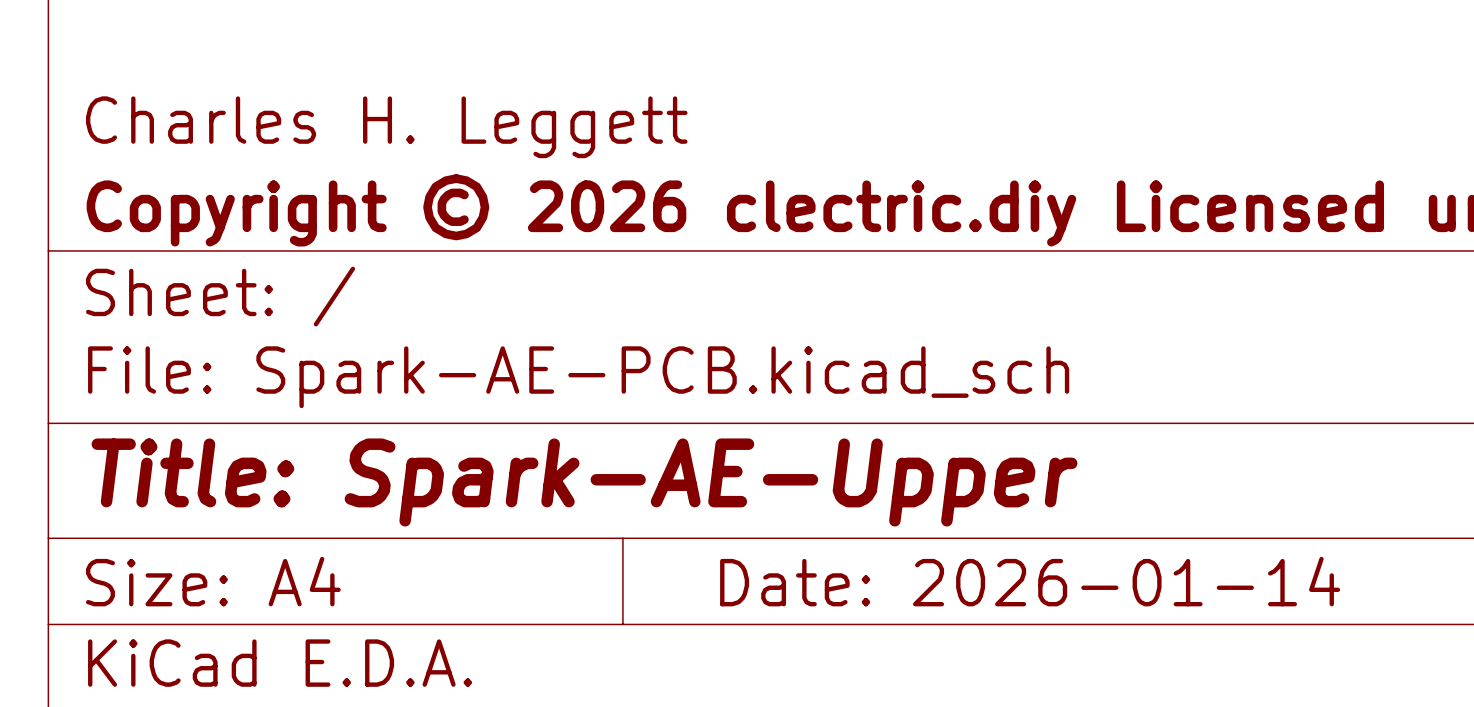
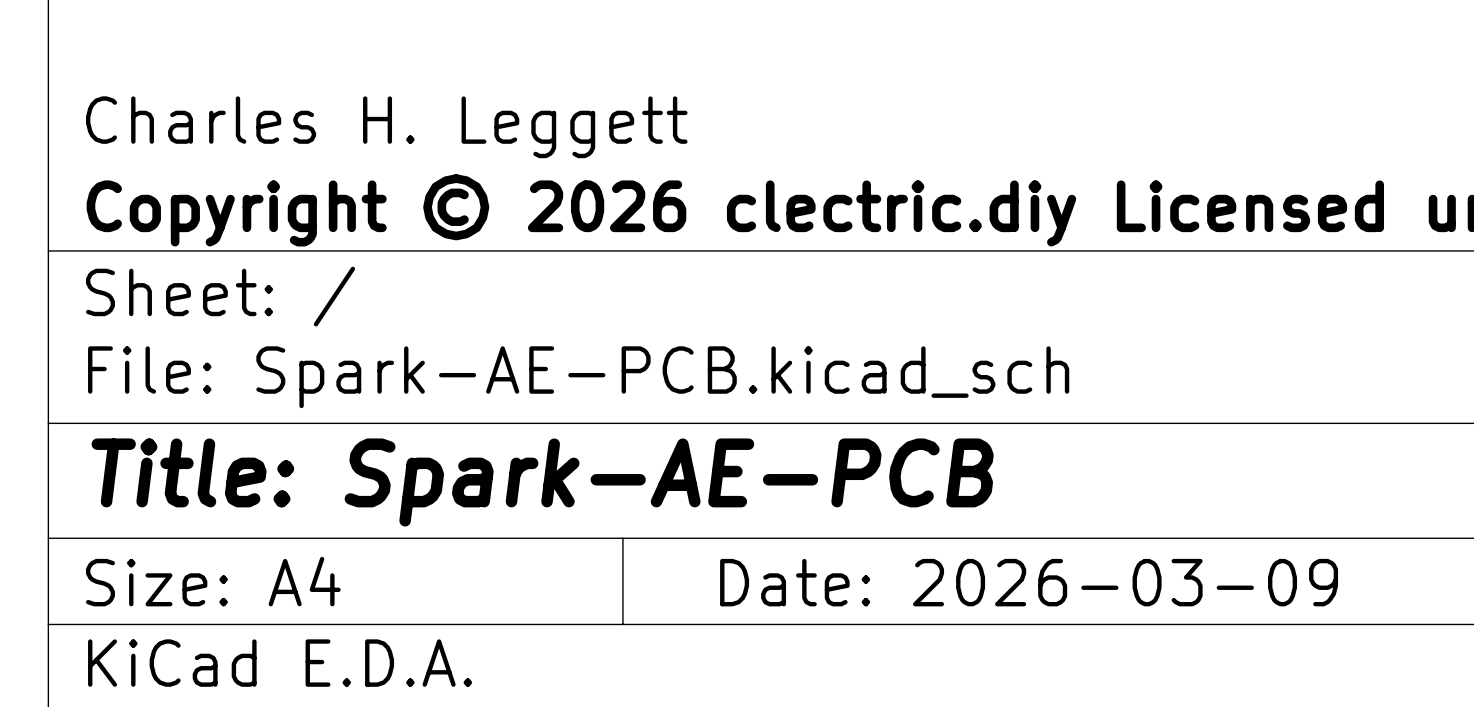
title block: Title: Spark-AE-Upper (584, 482) -> Title: Spark-AE-PCB (542, 482)
title block: Date: 2026-01-14 (1030, 581) -> Date: 2026-03-09 (1029, 582)

